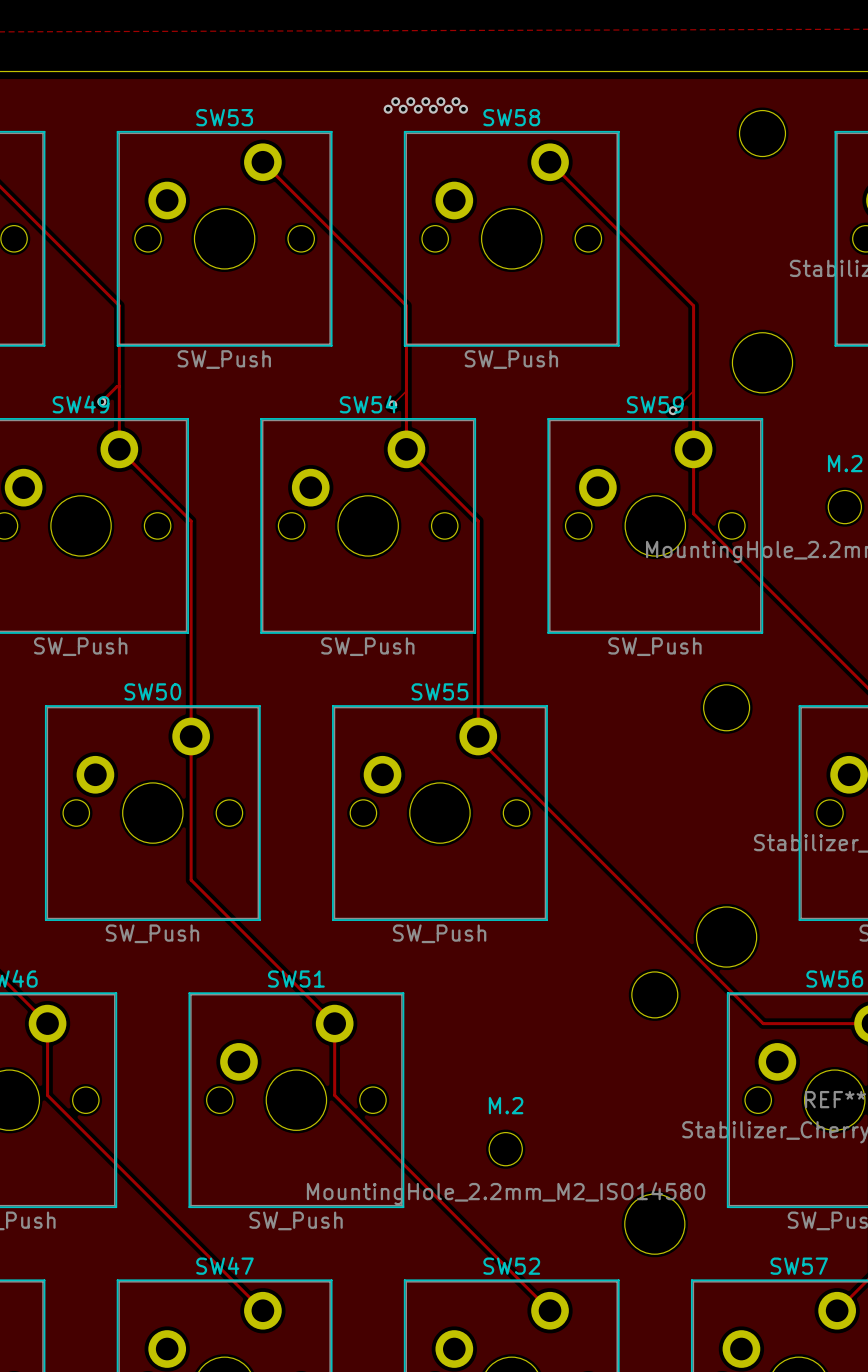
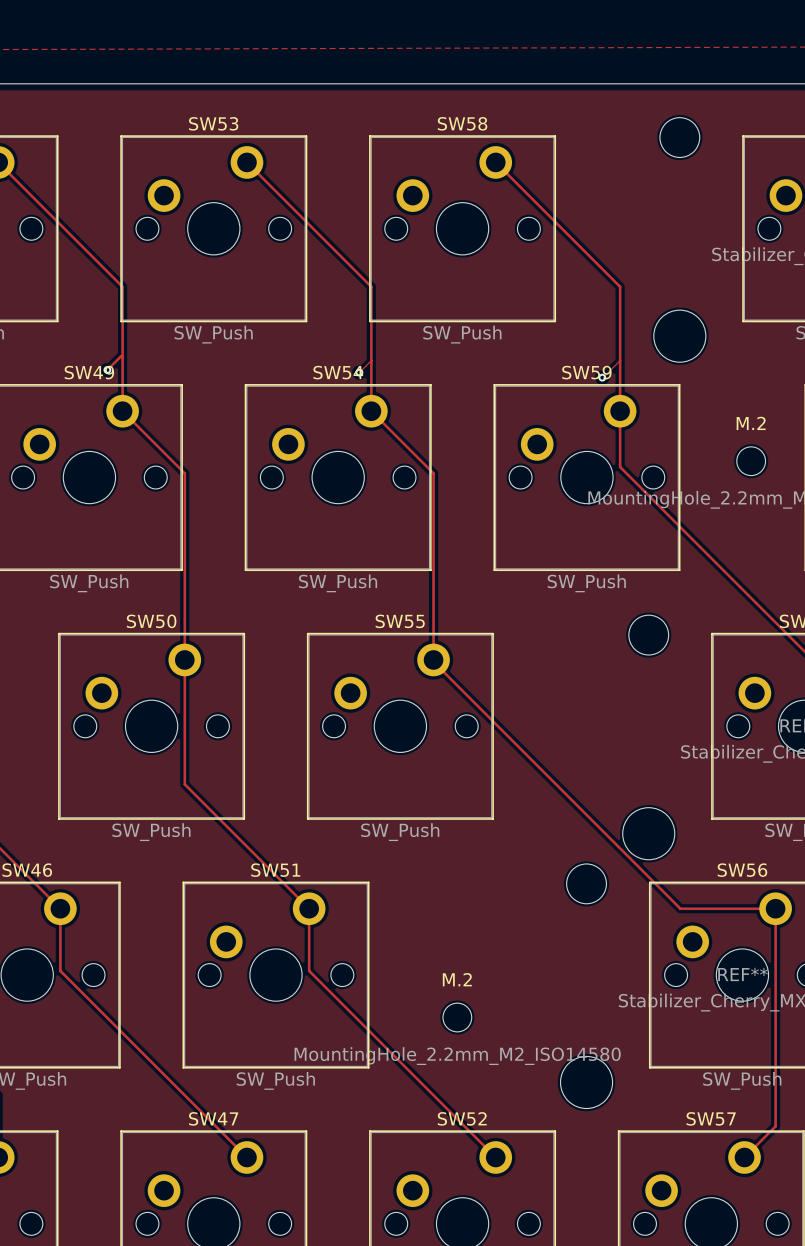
via: (395, 101) -> none
via: (410, 101) -> none
via: (425, 101) -> none
via: (440, 101) -> none
via: (455, 101) -> none
via: (388, 109) -> none
via: (403, 109) -> none
via: (418, 109) -> none
via: (433, 109) -> none
via: (448, 109) -> none
via: (463, 109) -> none

